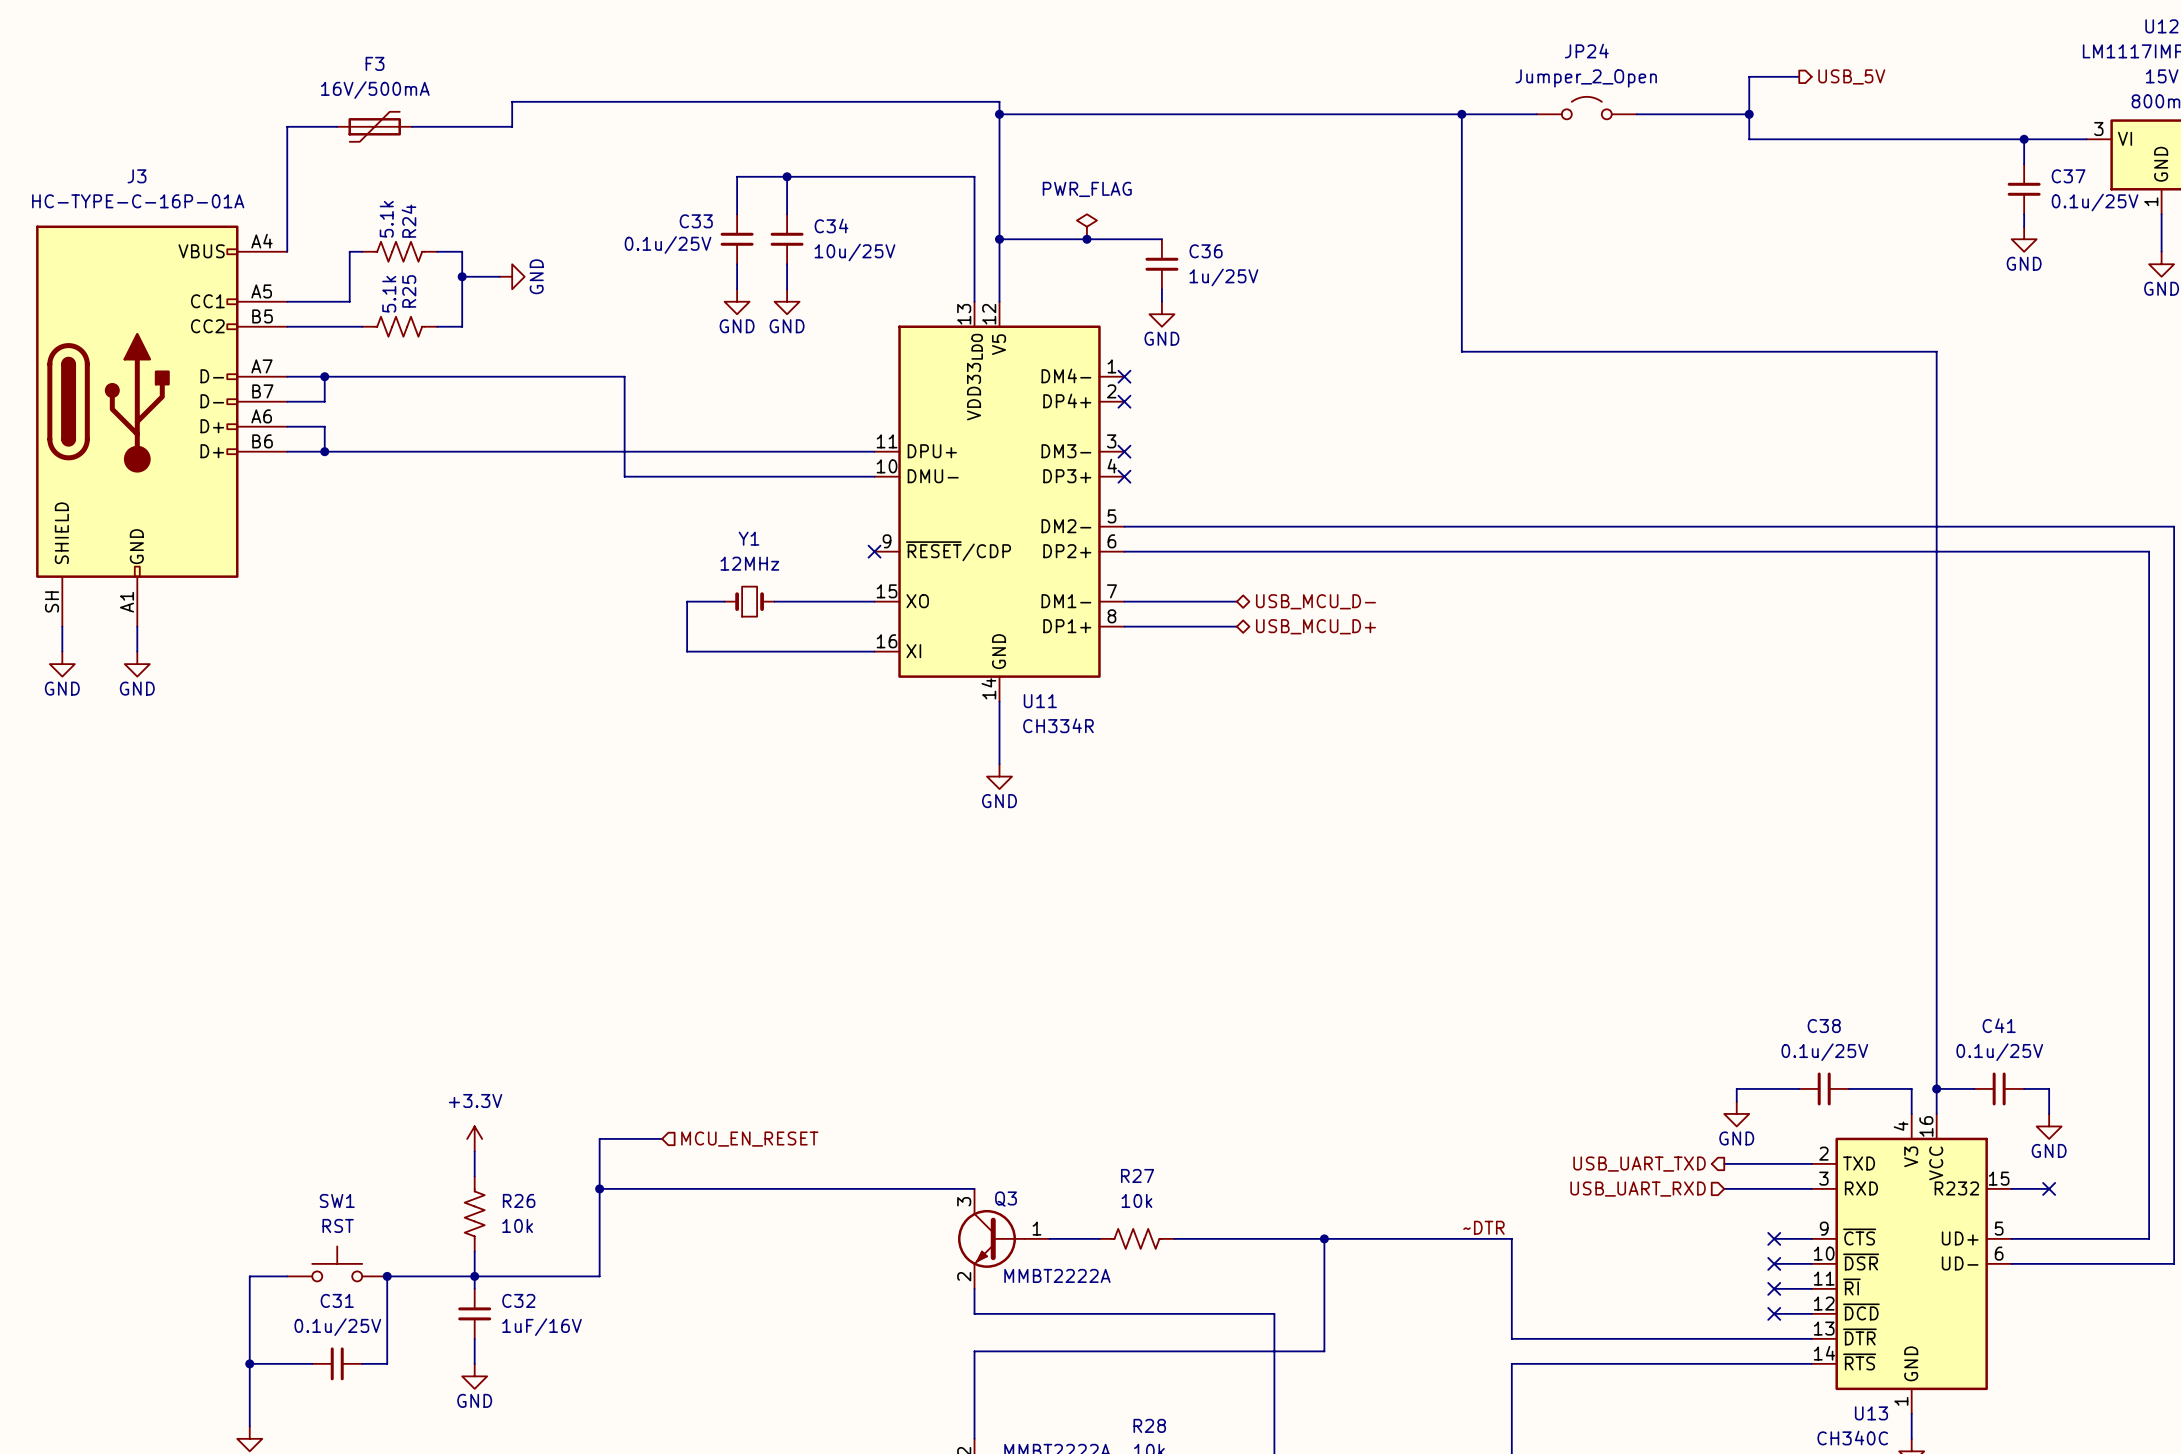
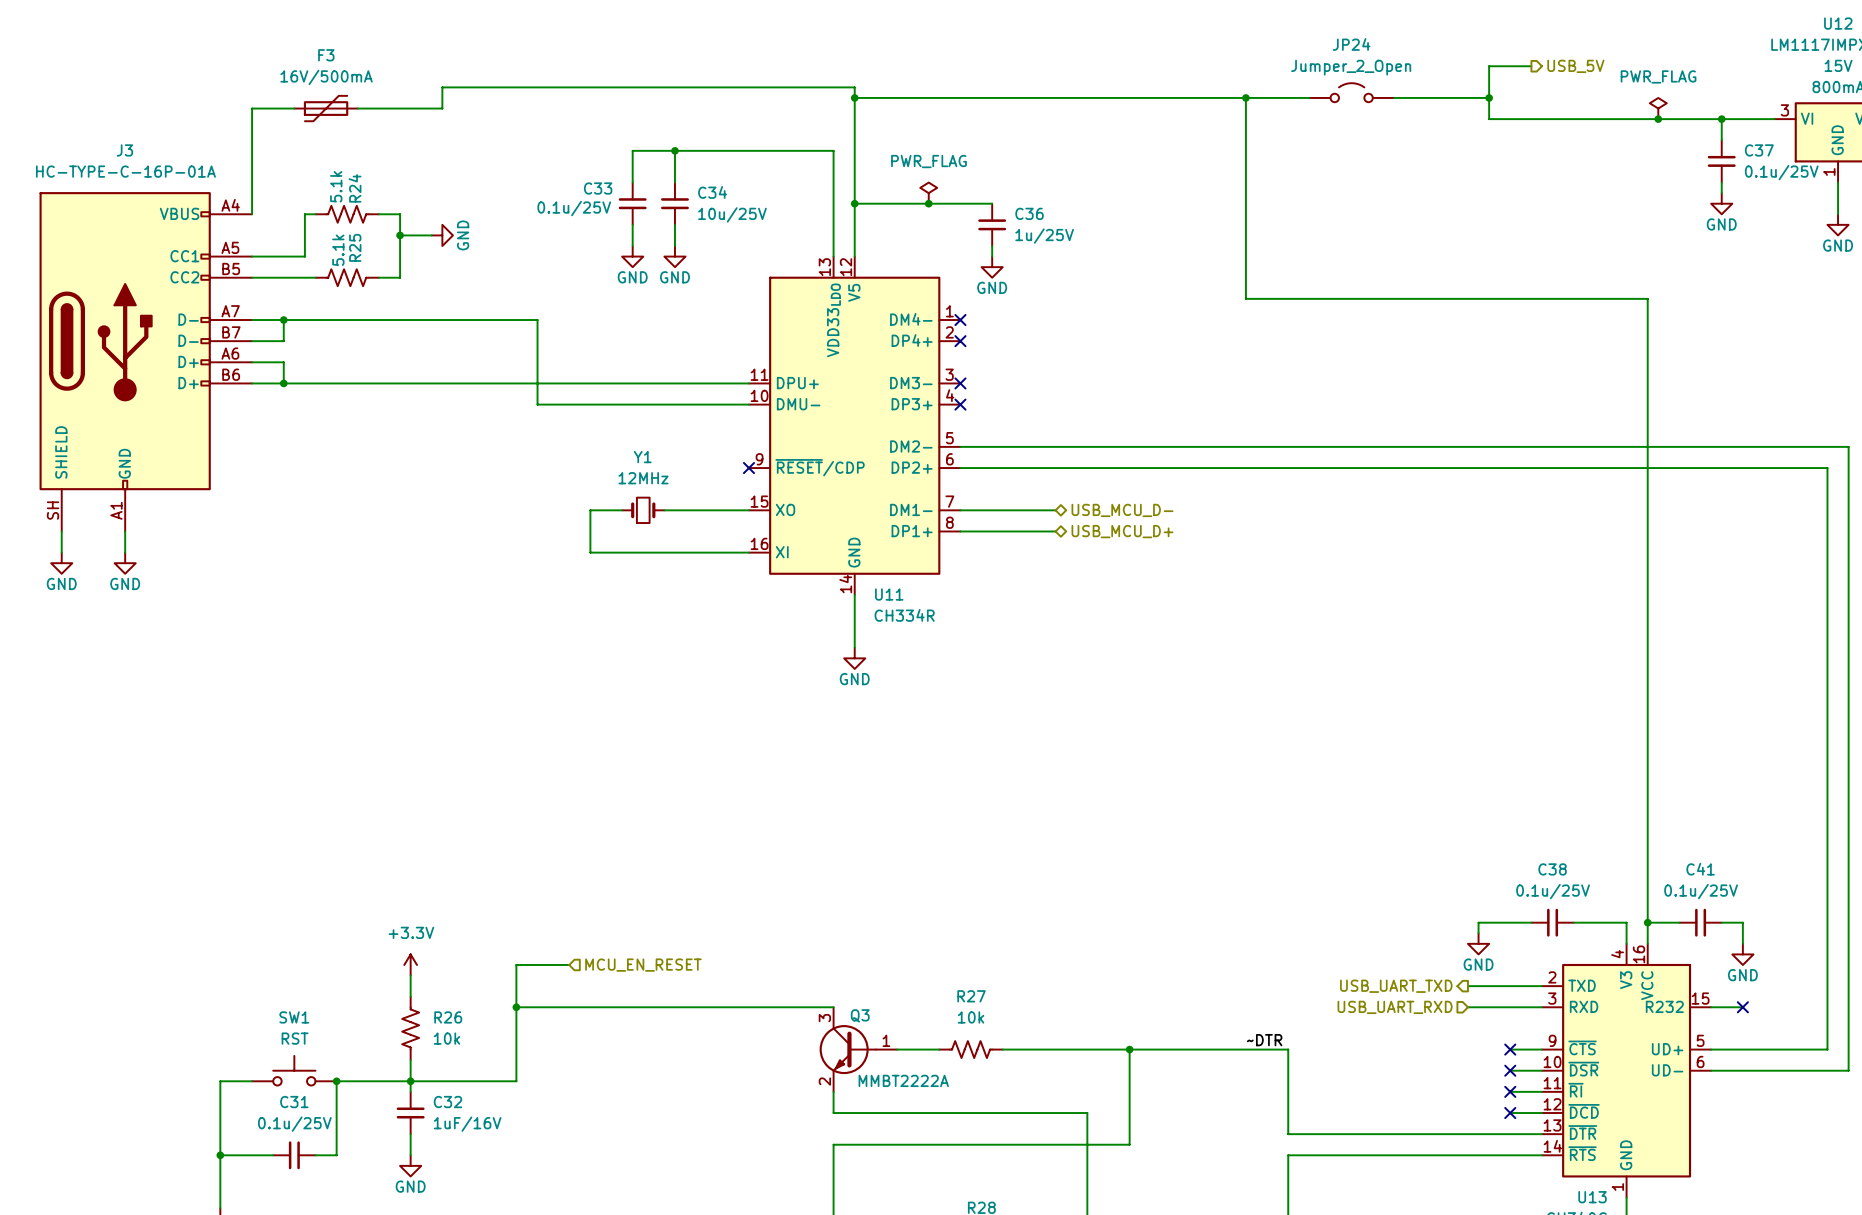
power symbol: none -> PWR_FLAG (1658, 108)
junction: none -> (1658, 119)

